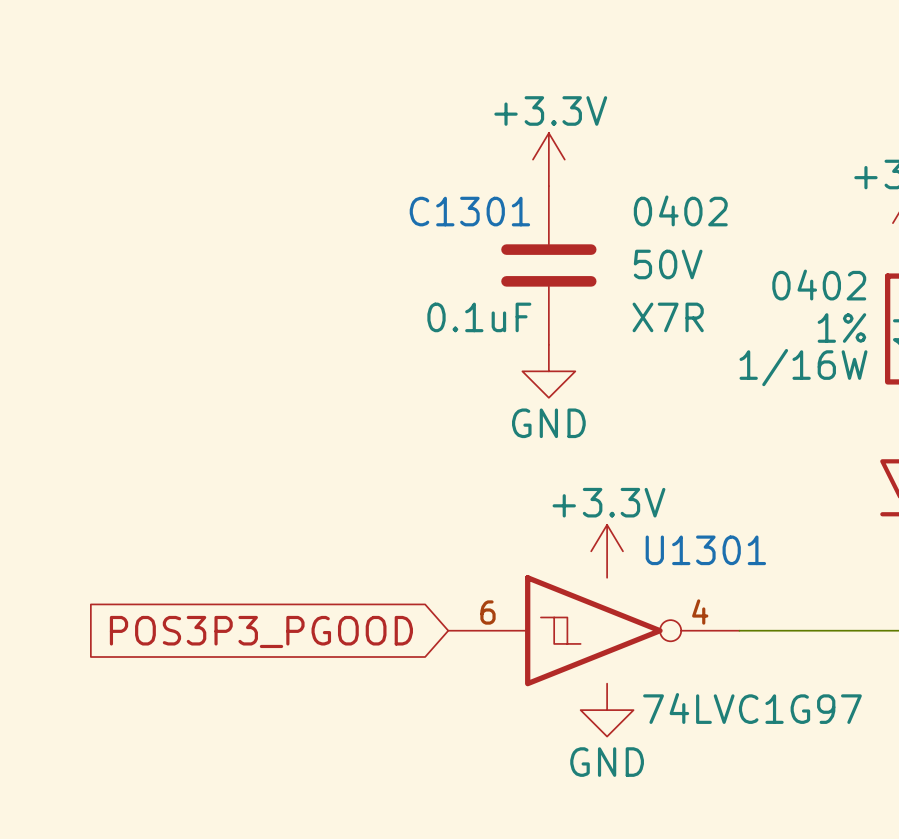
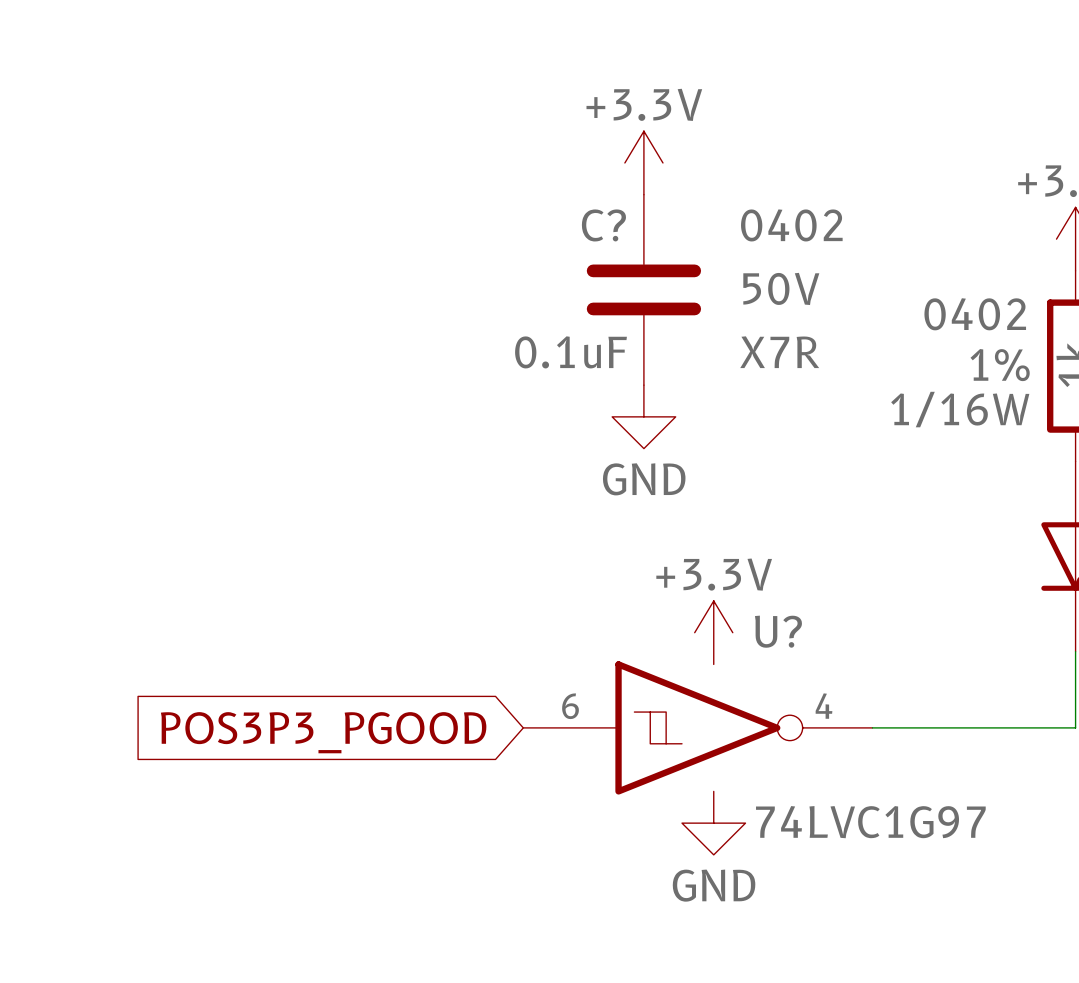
C1301 name: C1301 (469, 211) -> C? (603, 225)
U1301 name: U1301 (705, 550) -> U? (778, 631)

